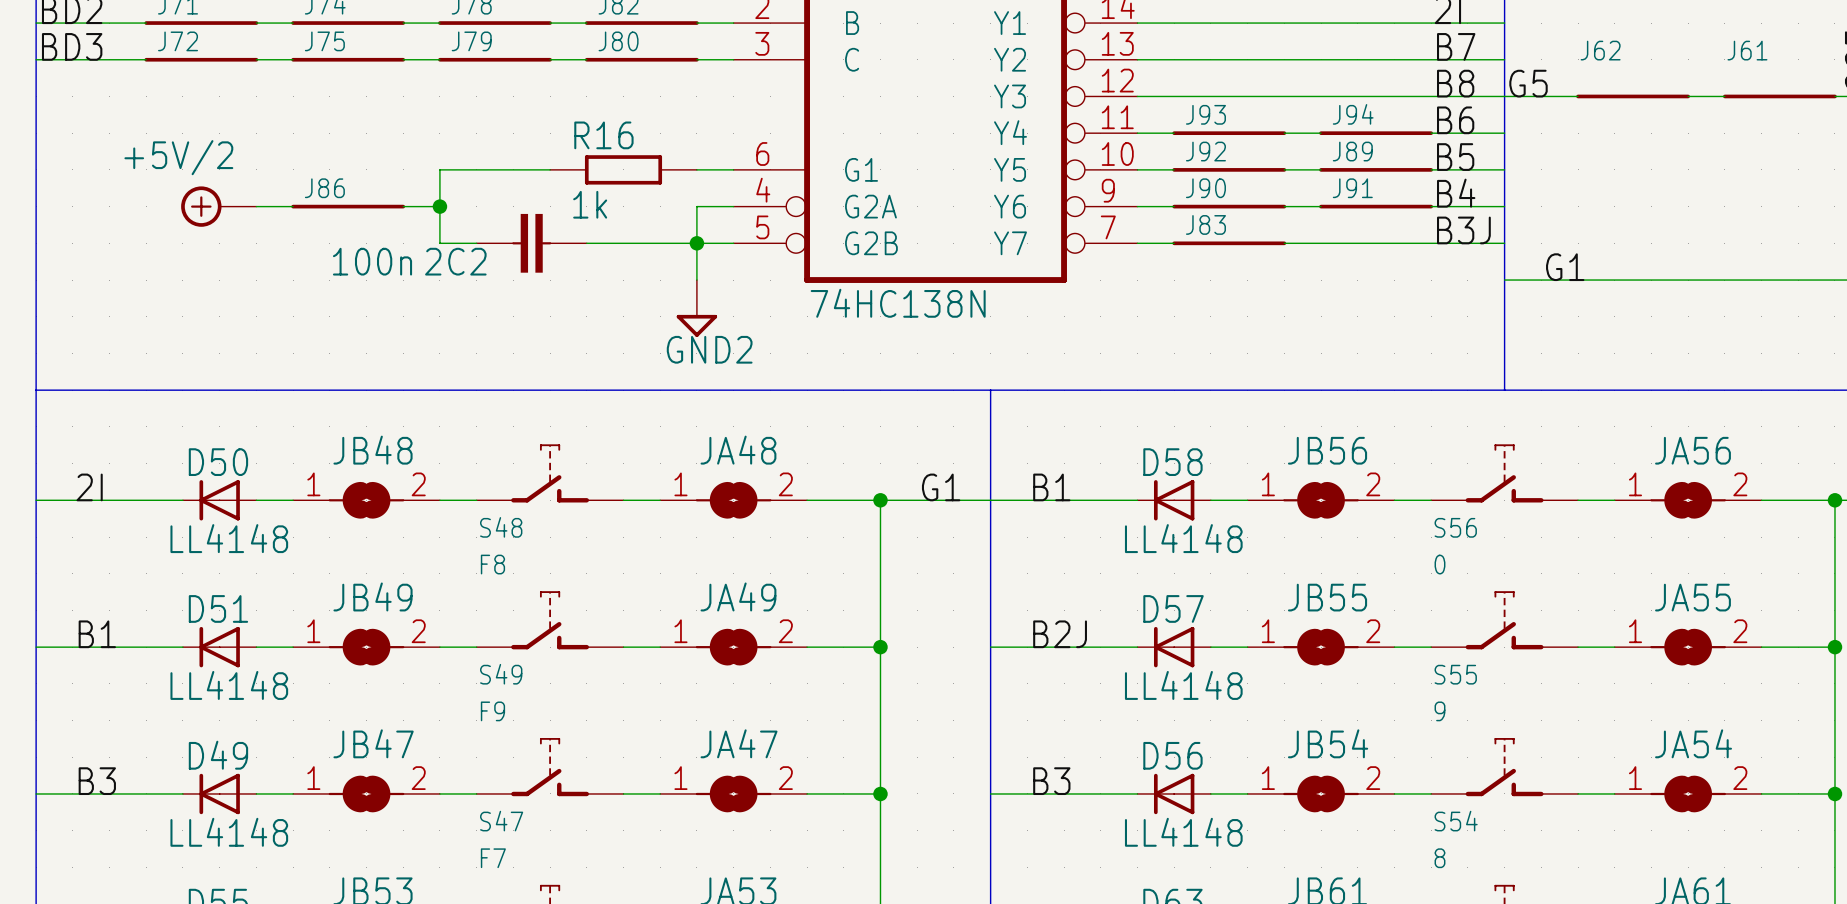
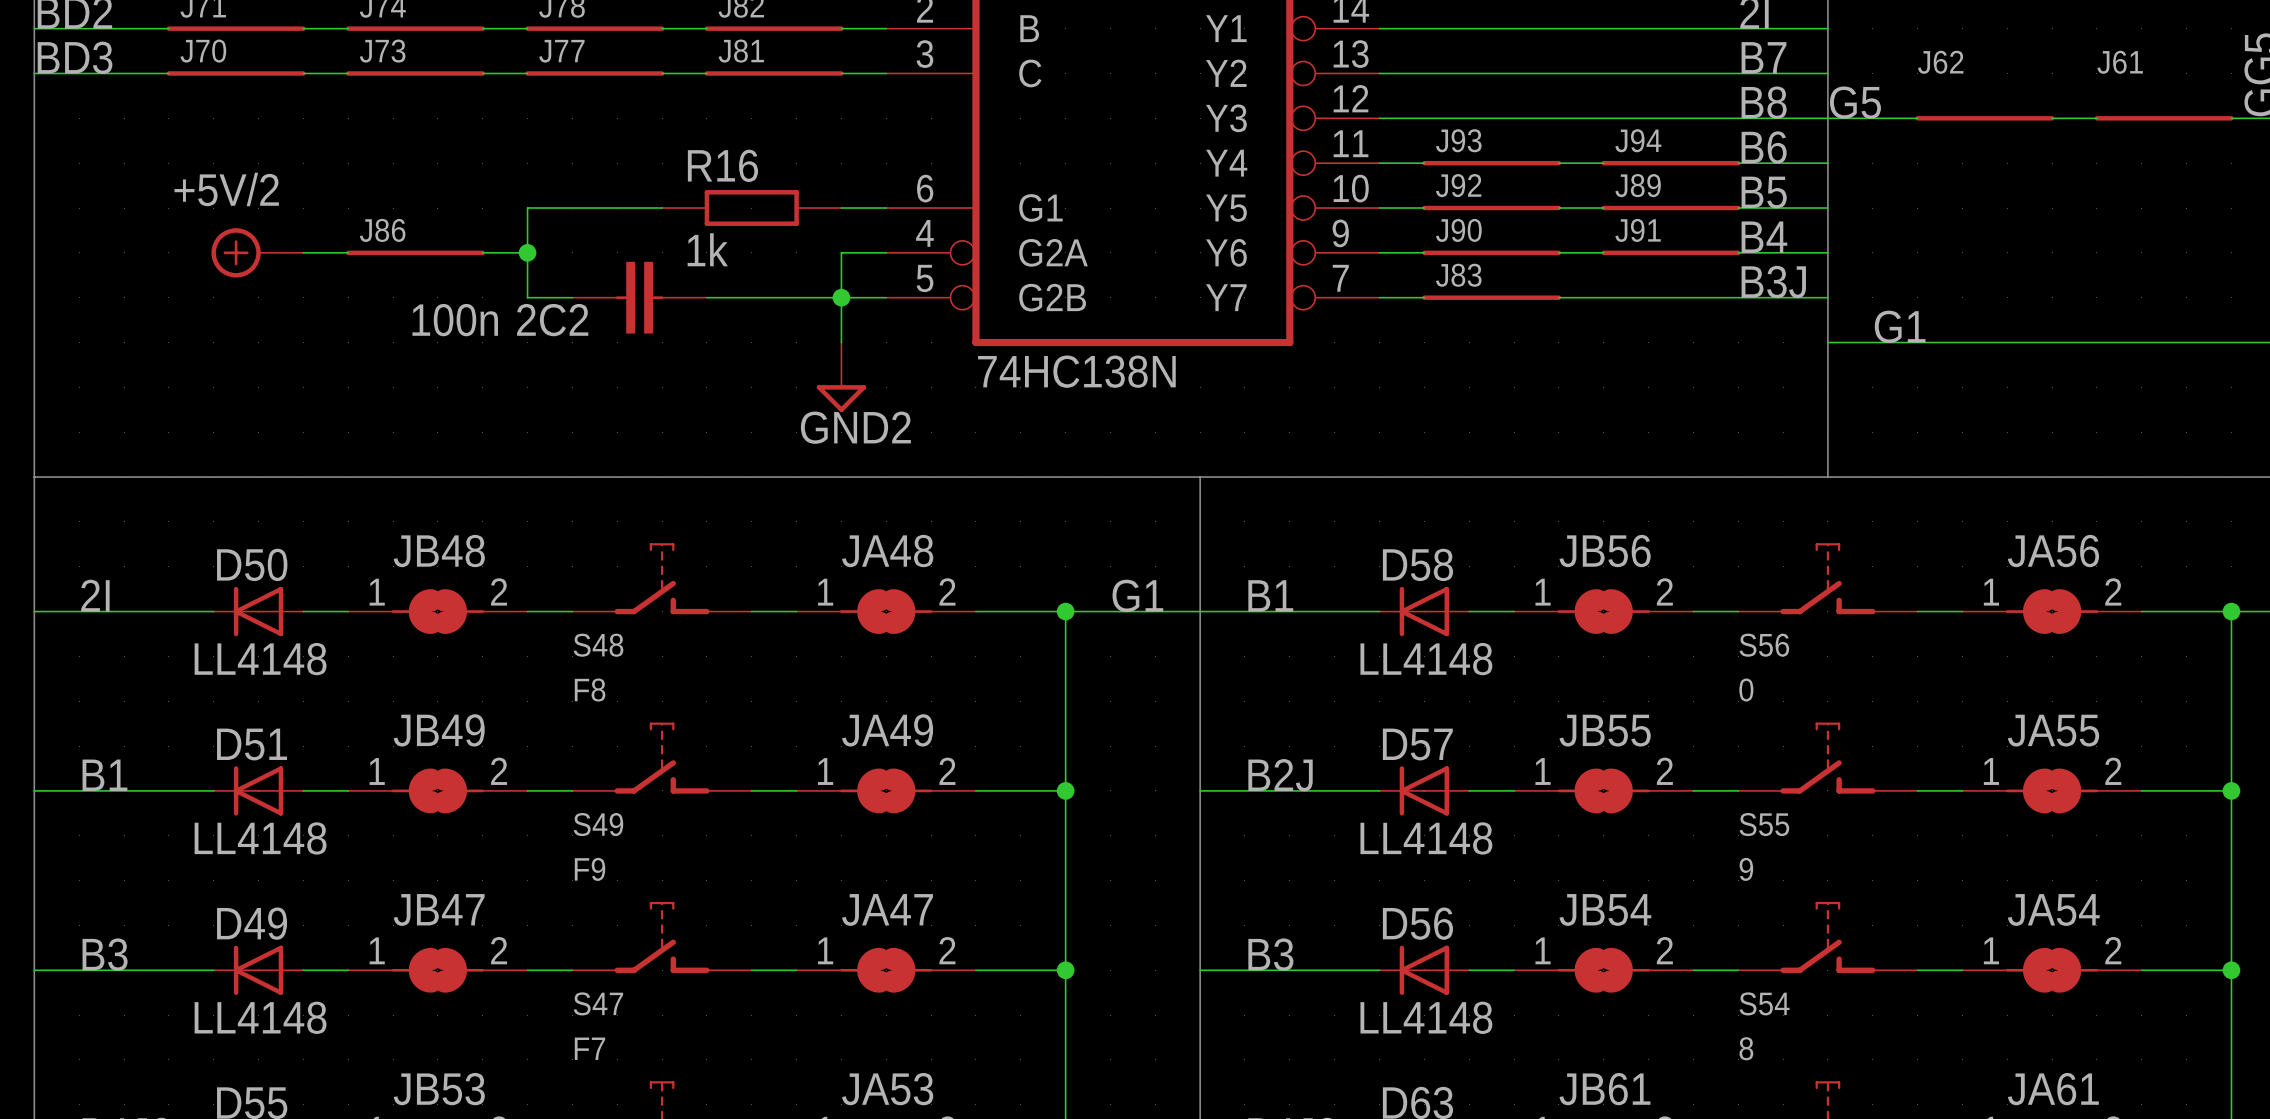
J72 name: J72 (178, 41) -> J70 (203, 51)
J75 name: J75 (324, 41) -> J73 (382, 51)
J79 name: J79 (471, 41) -> J77 (561, 51)
J80 name: J80 (618, 41) -> J81 (741, 51)

